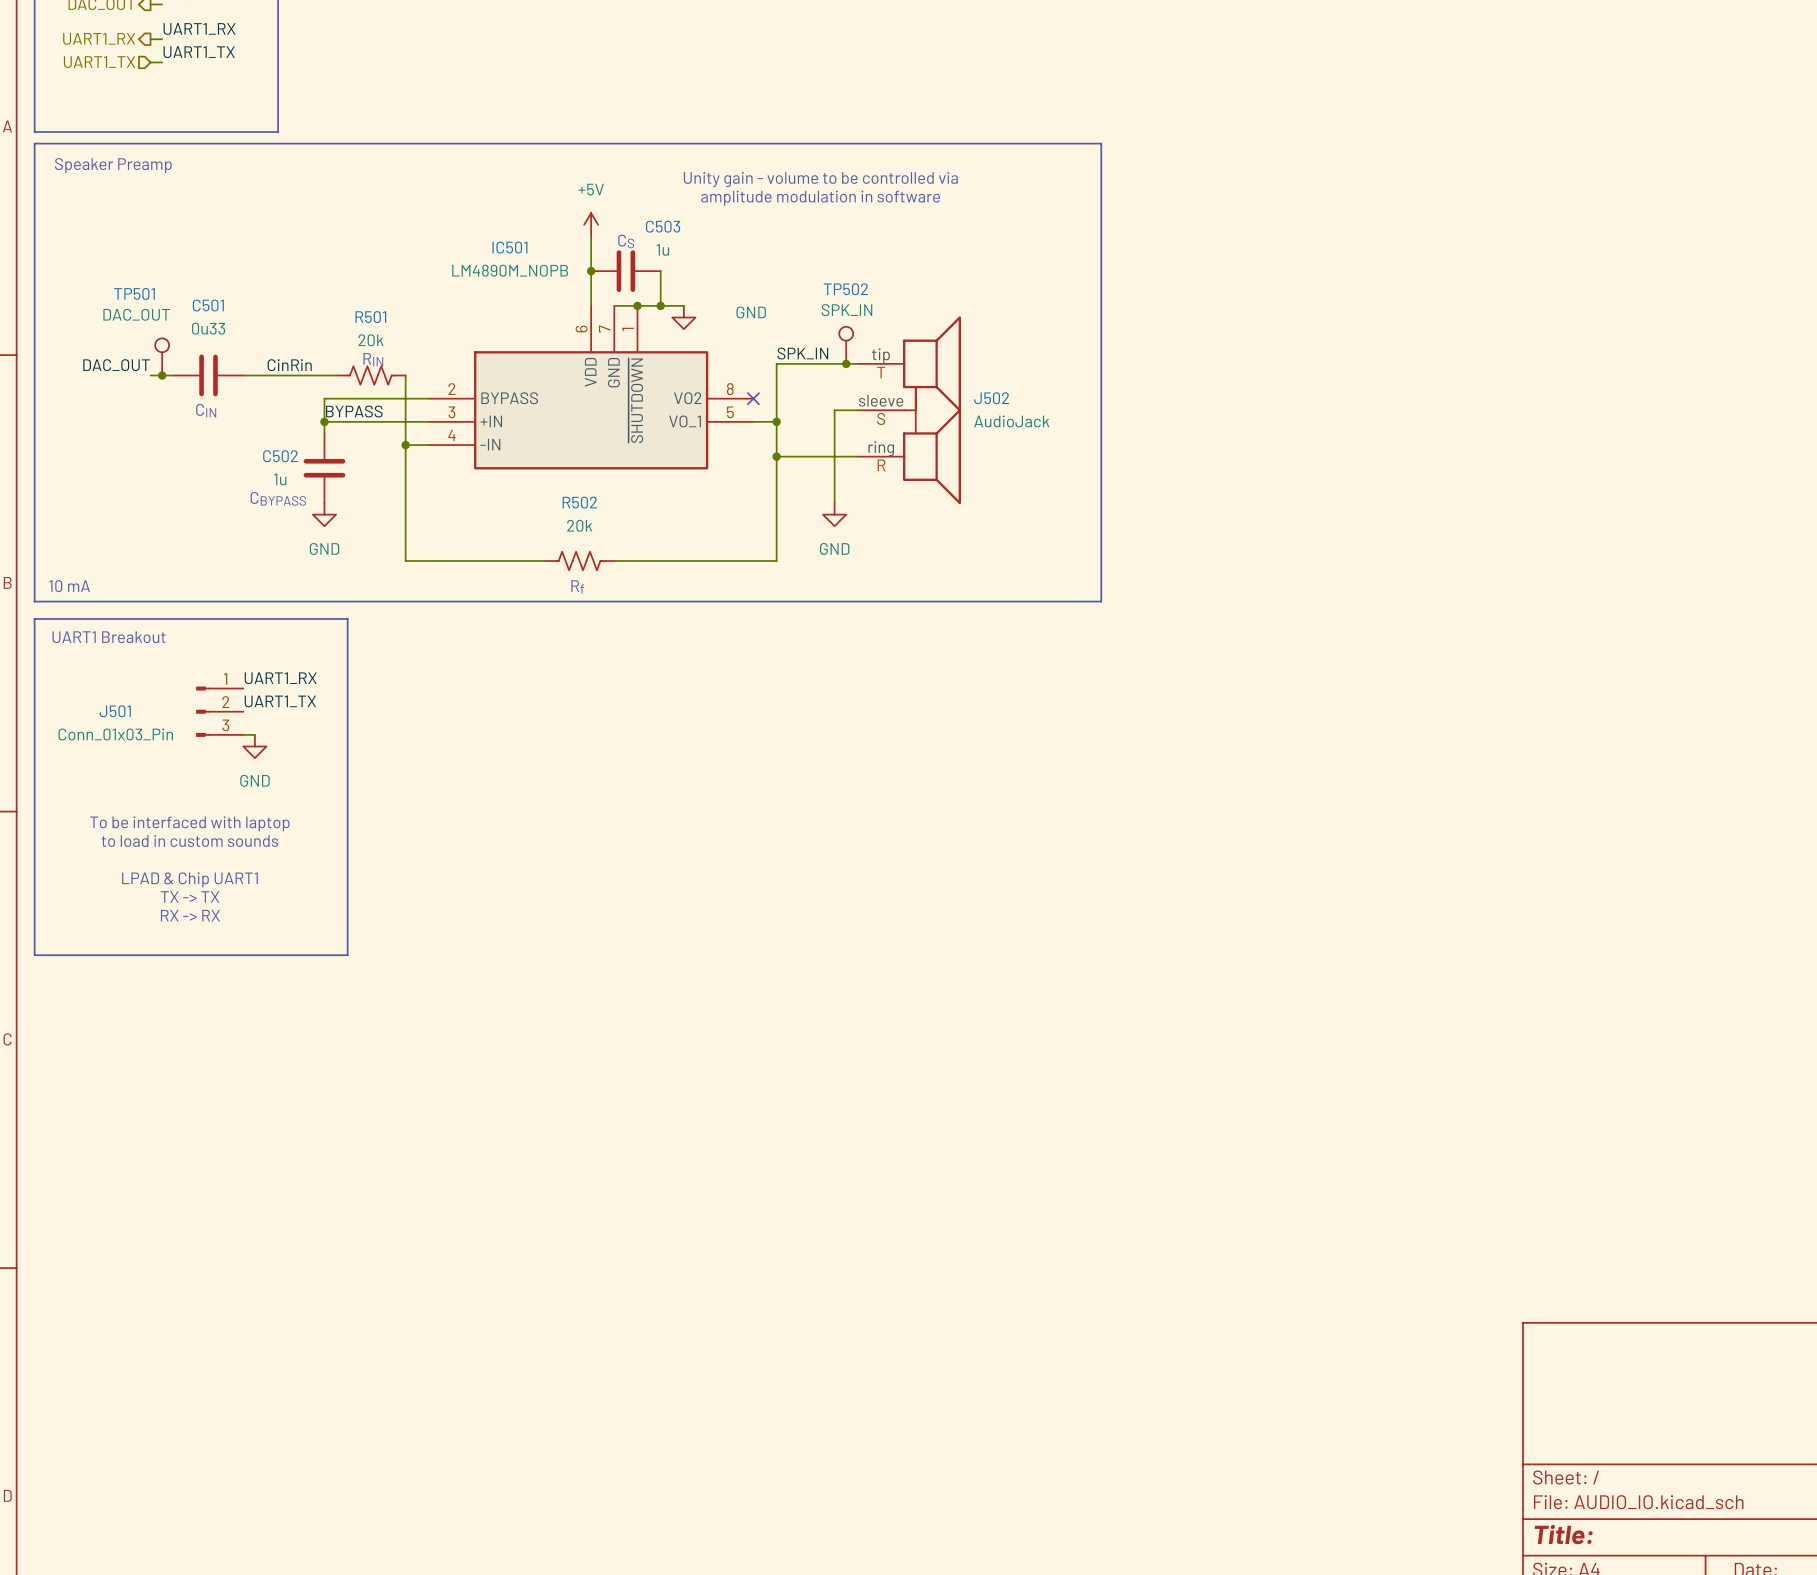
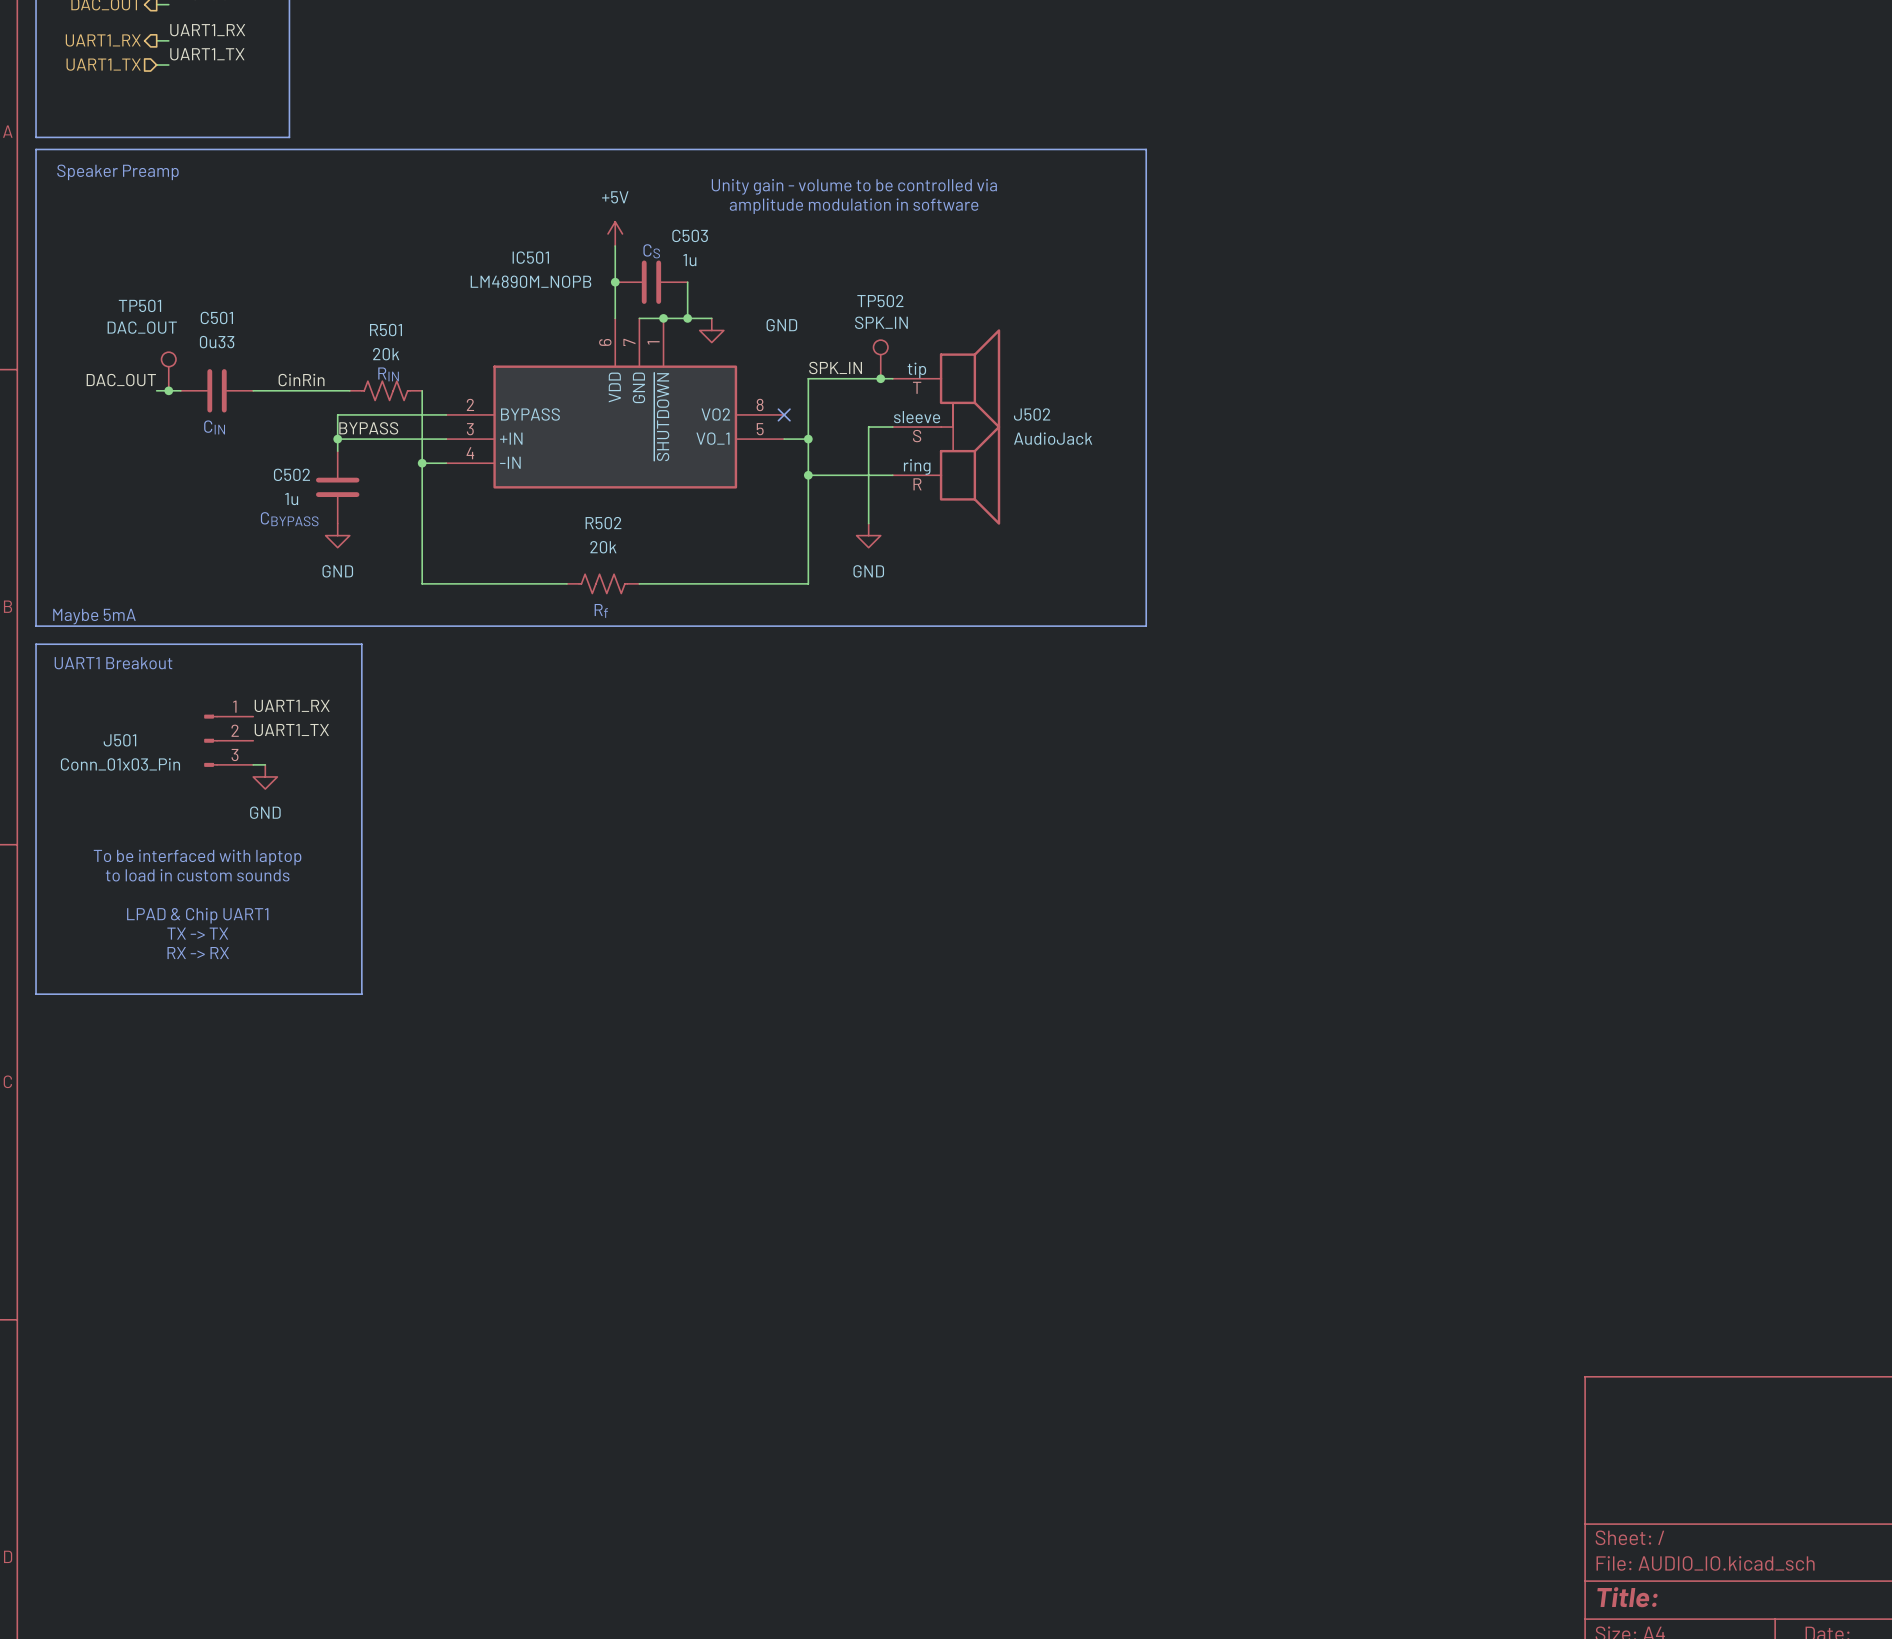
text: 10 mA (69, 586) -> none
text: none -> Maybe 5mA (94, 616)

